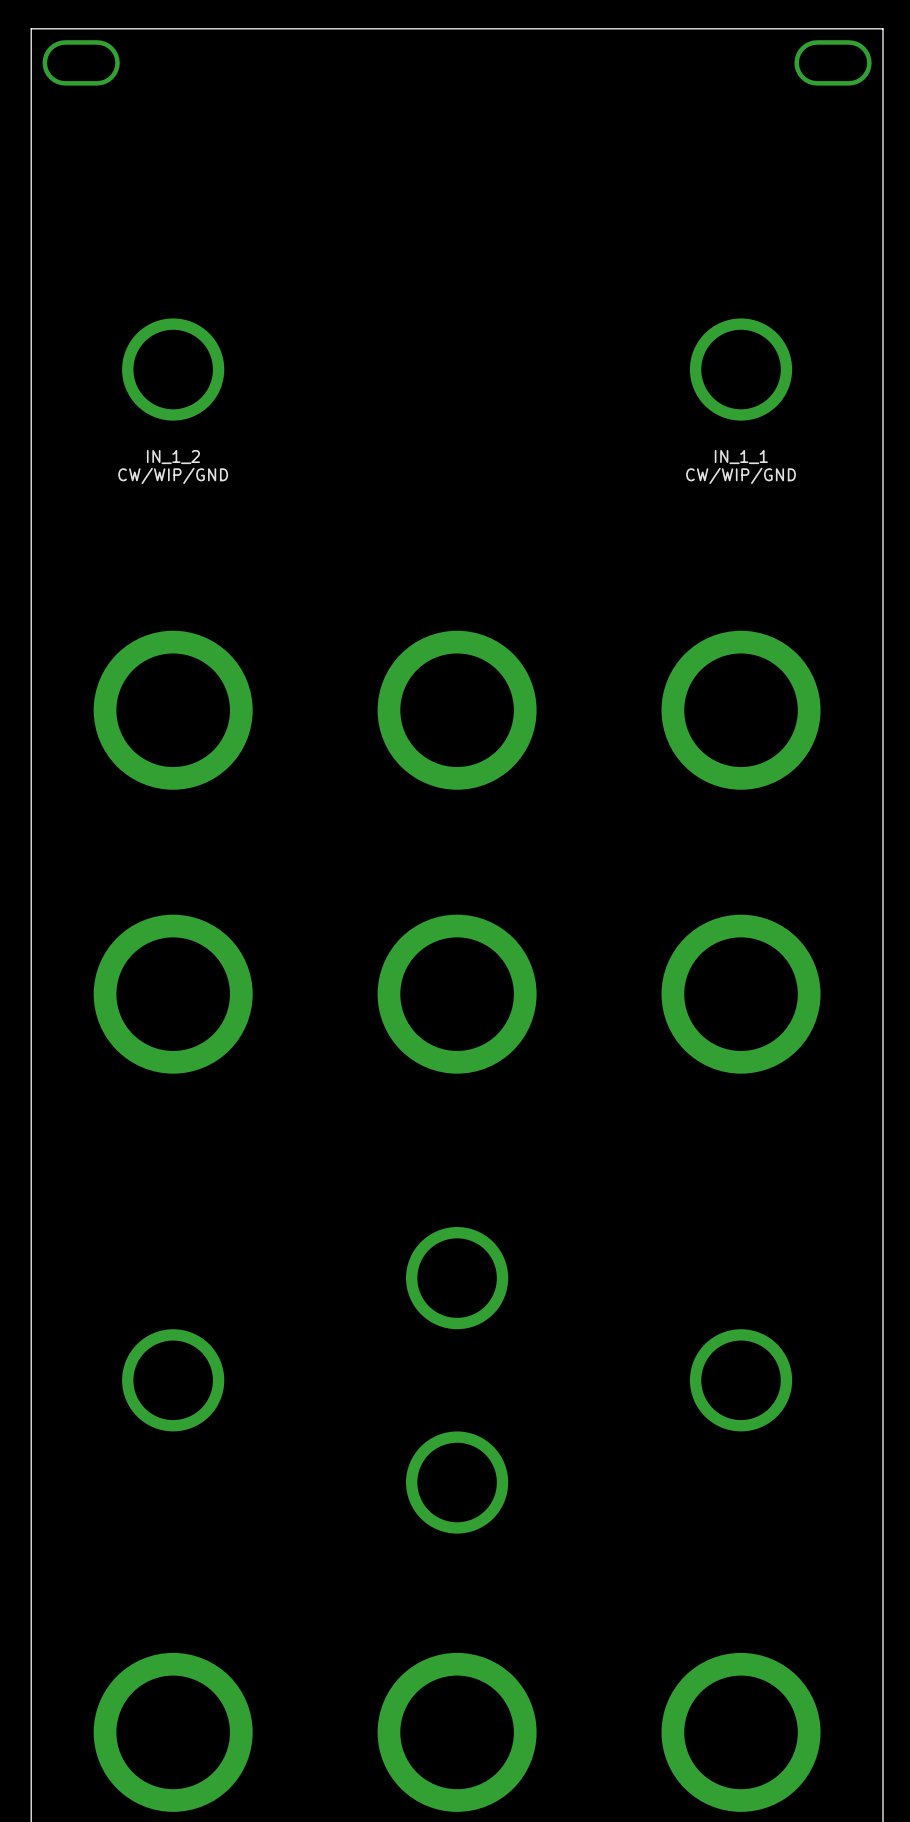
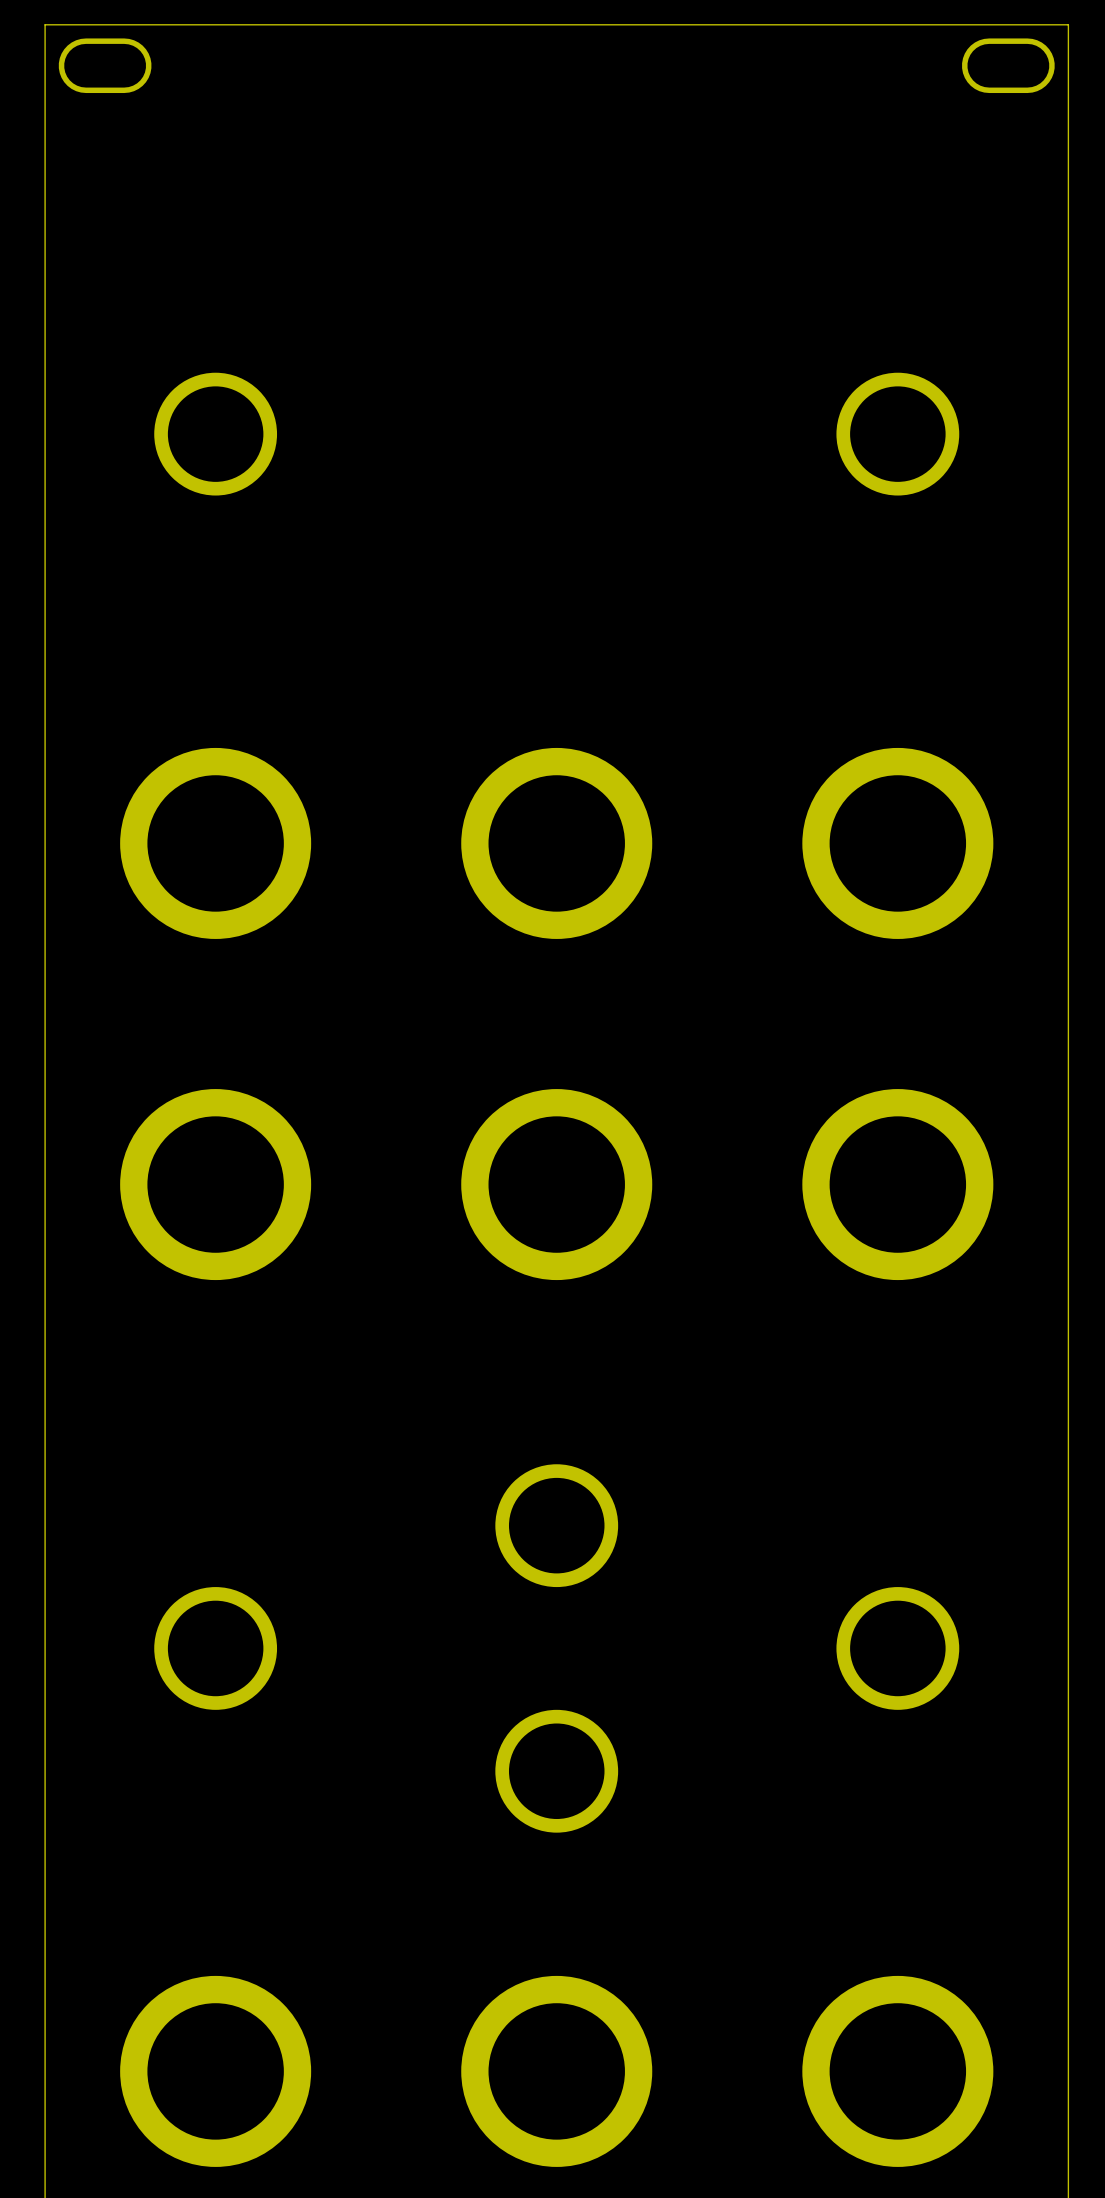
text: IN_1_2 (173, 457) -> none
text: IN_1_1 (741, 457) -> none
text: CW/WIP/GND (173, 475) -> none
text: CW/WIP/GND (741, 475) -> none

